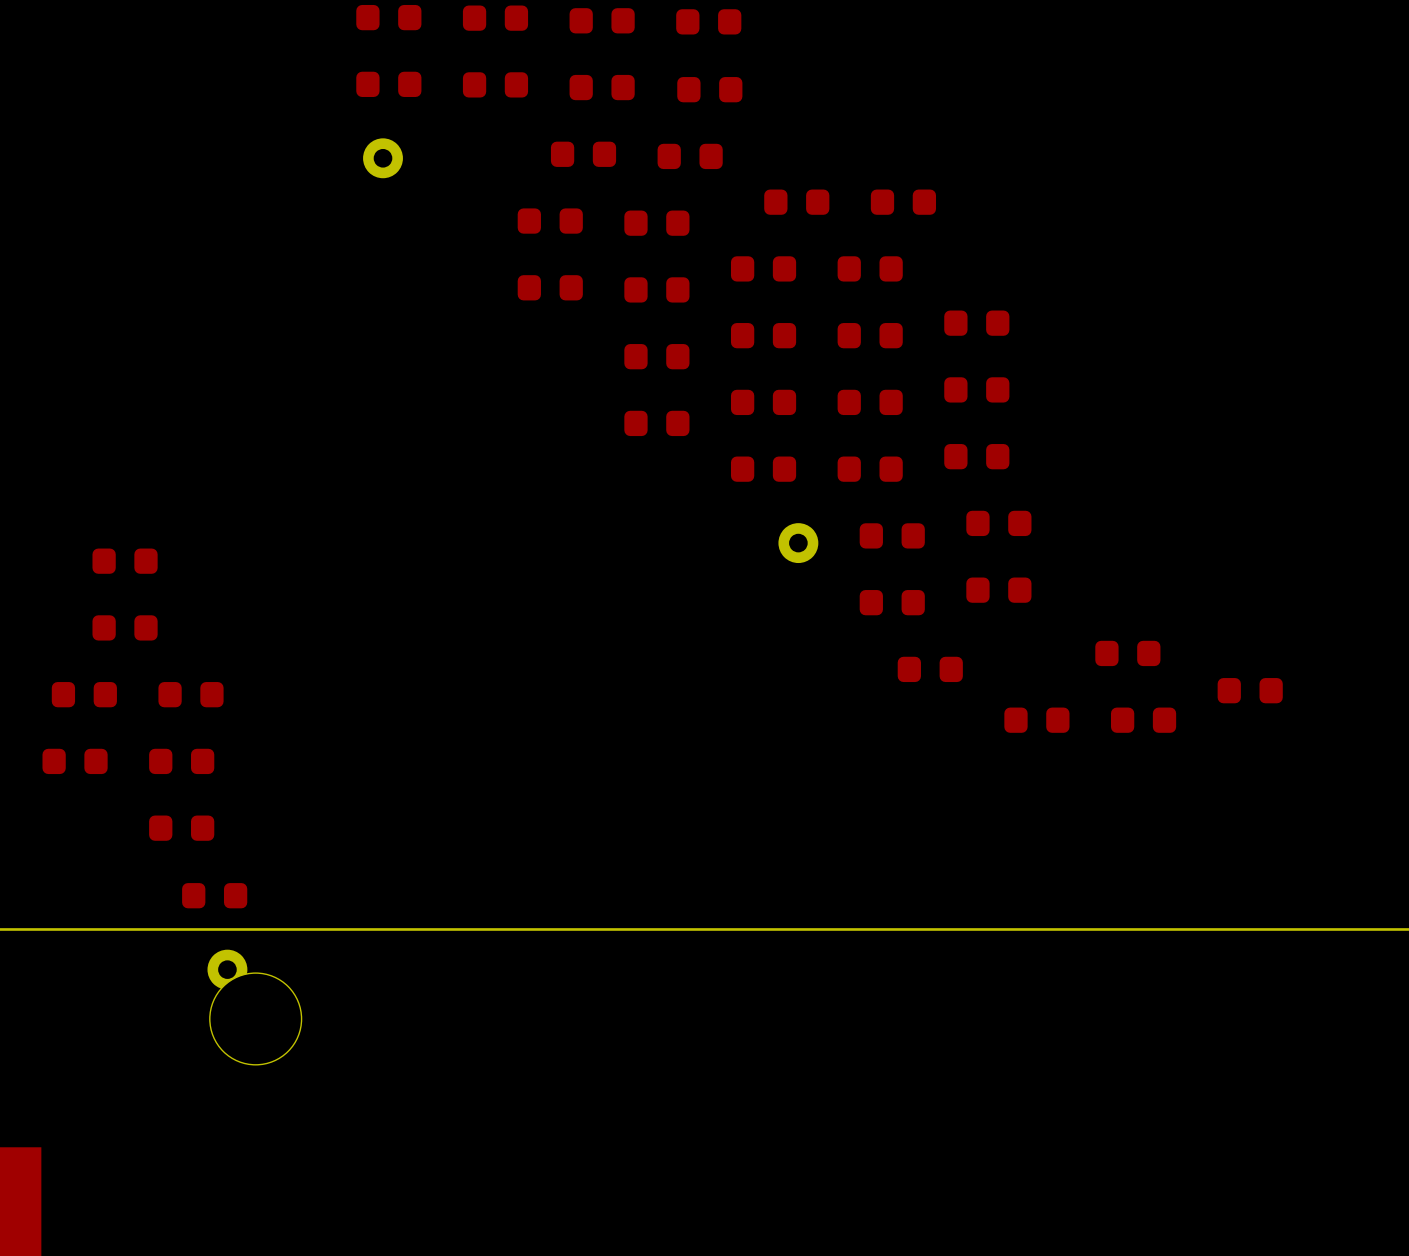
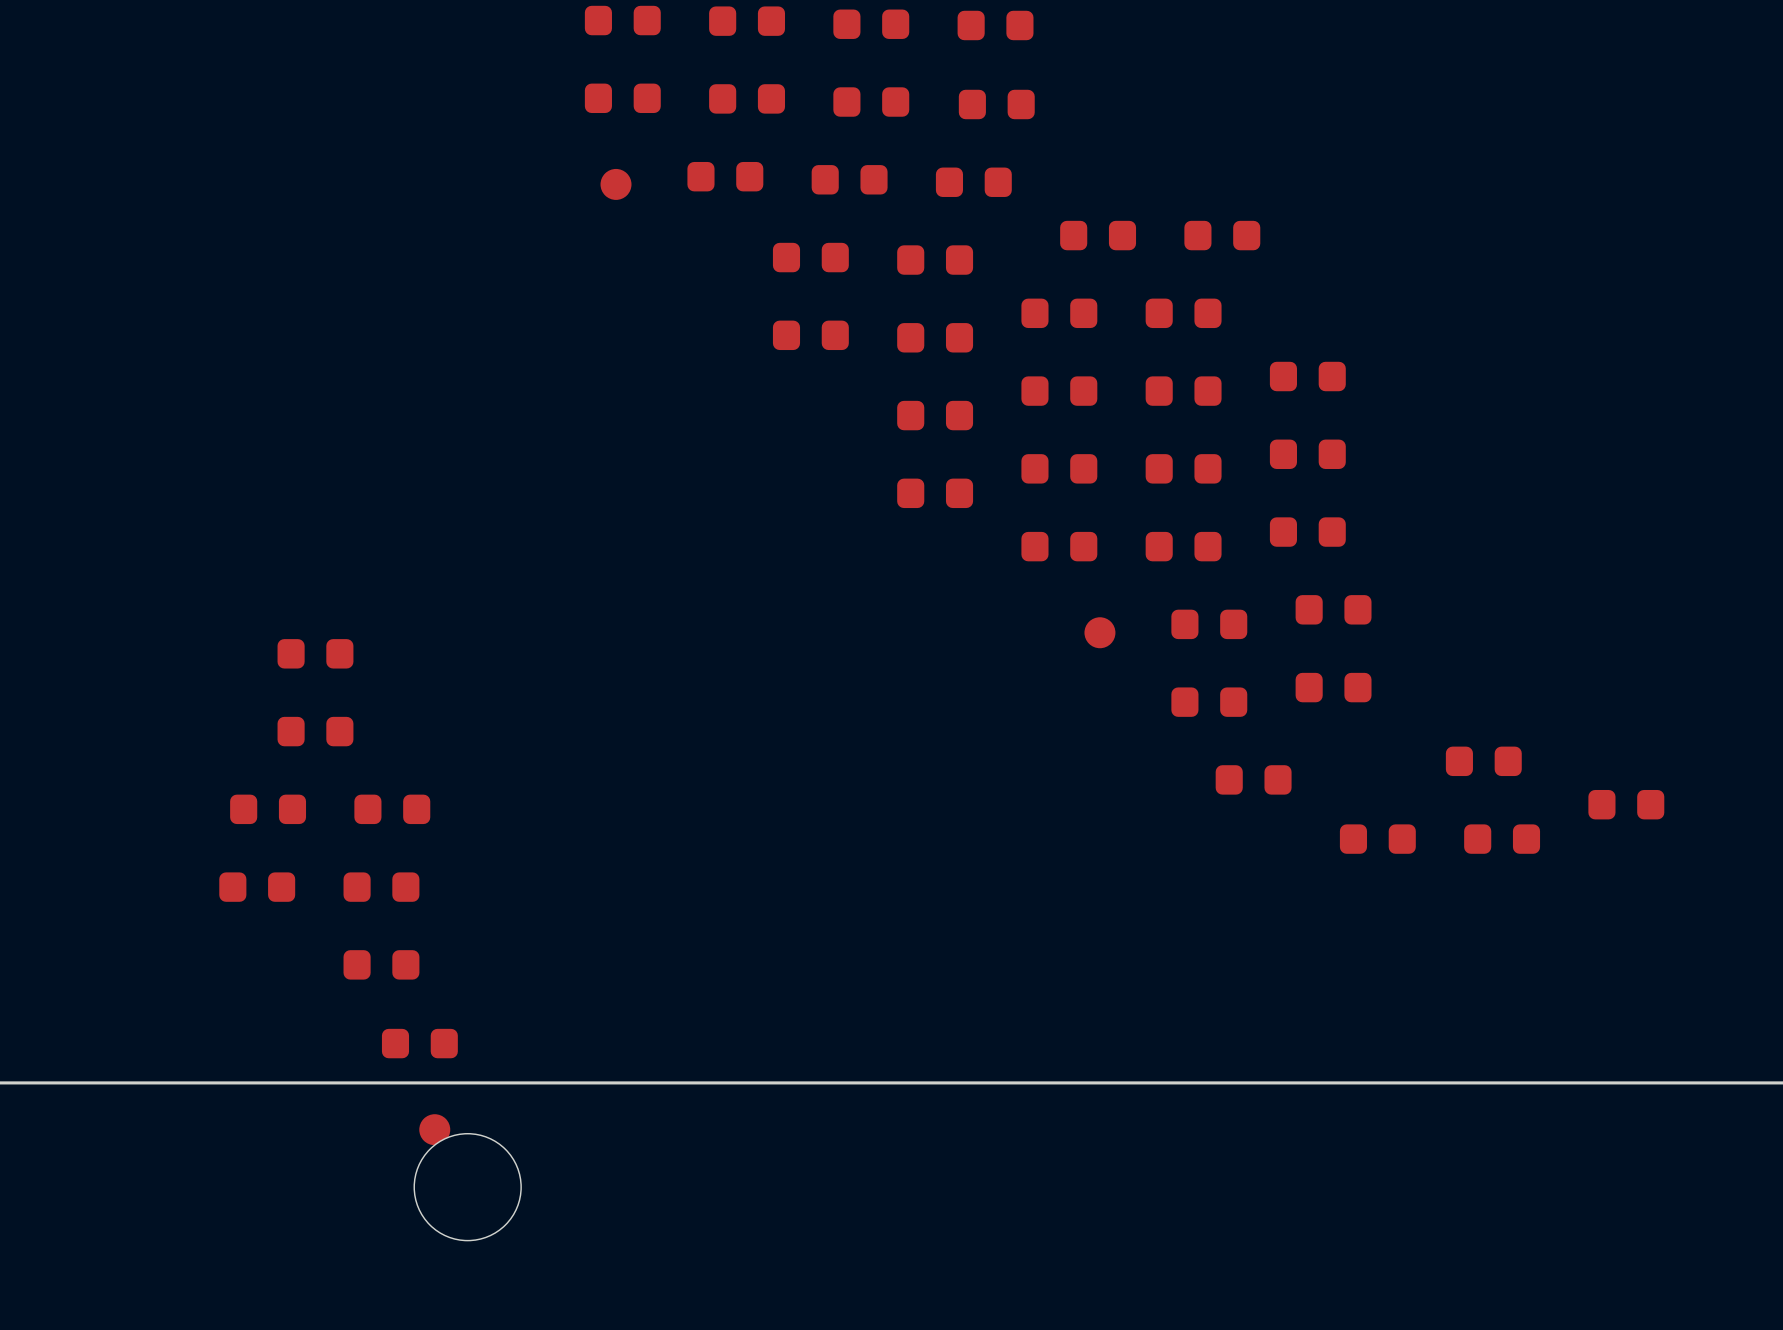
part footprint: [363, 138, 403, 179] -> [600, 168, 632, 200]
part: none -> (725, 176)
part footprint: [778, 523, 819, 564] -> [1084, 617, 1116, 649]
part footprint: [207, 949, 248, 990] -> [419, 1114, 451, 1146]

